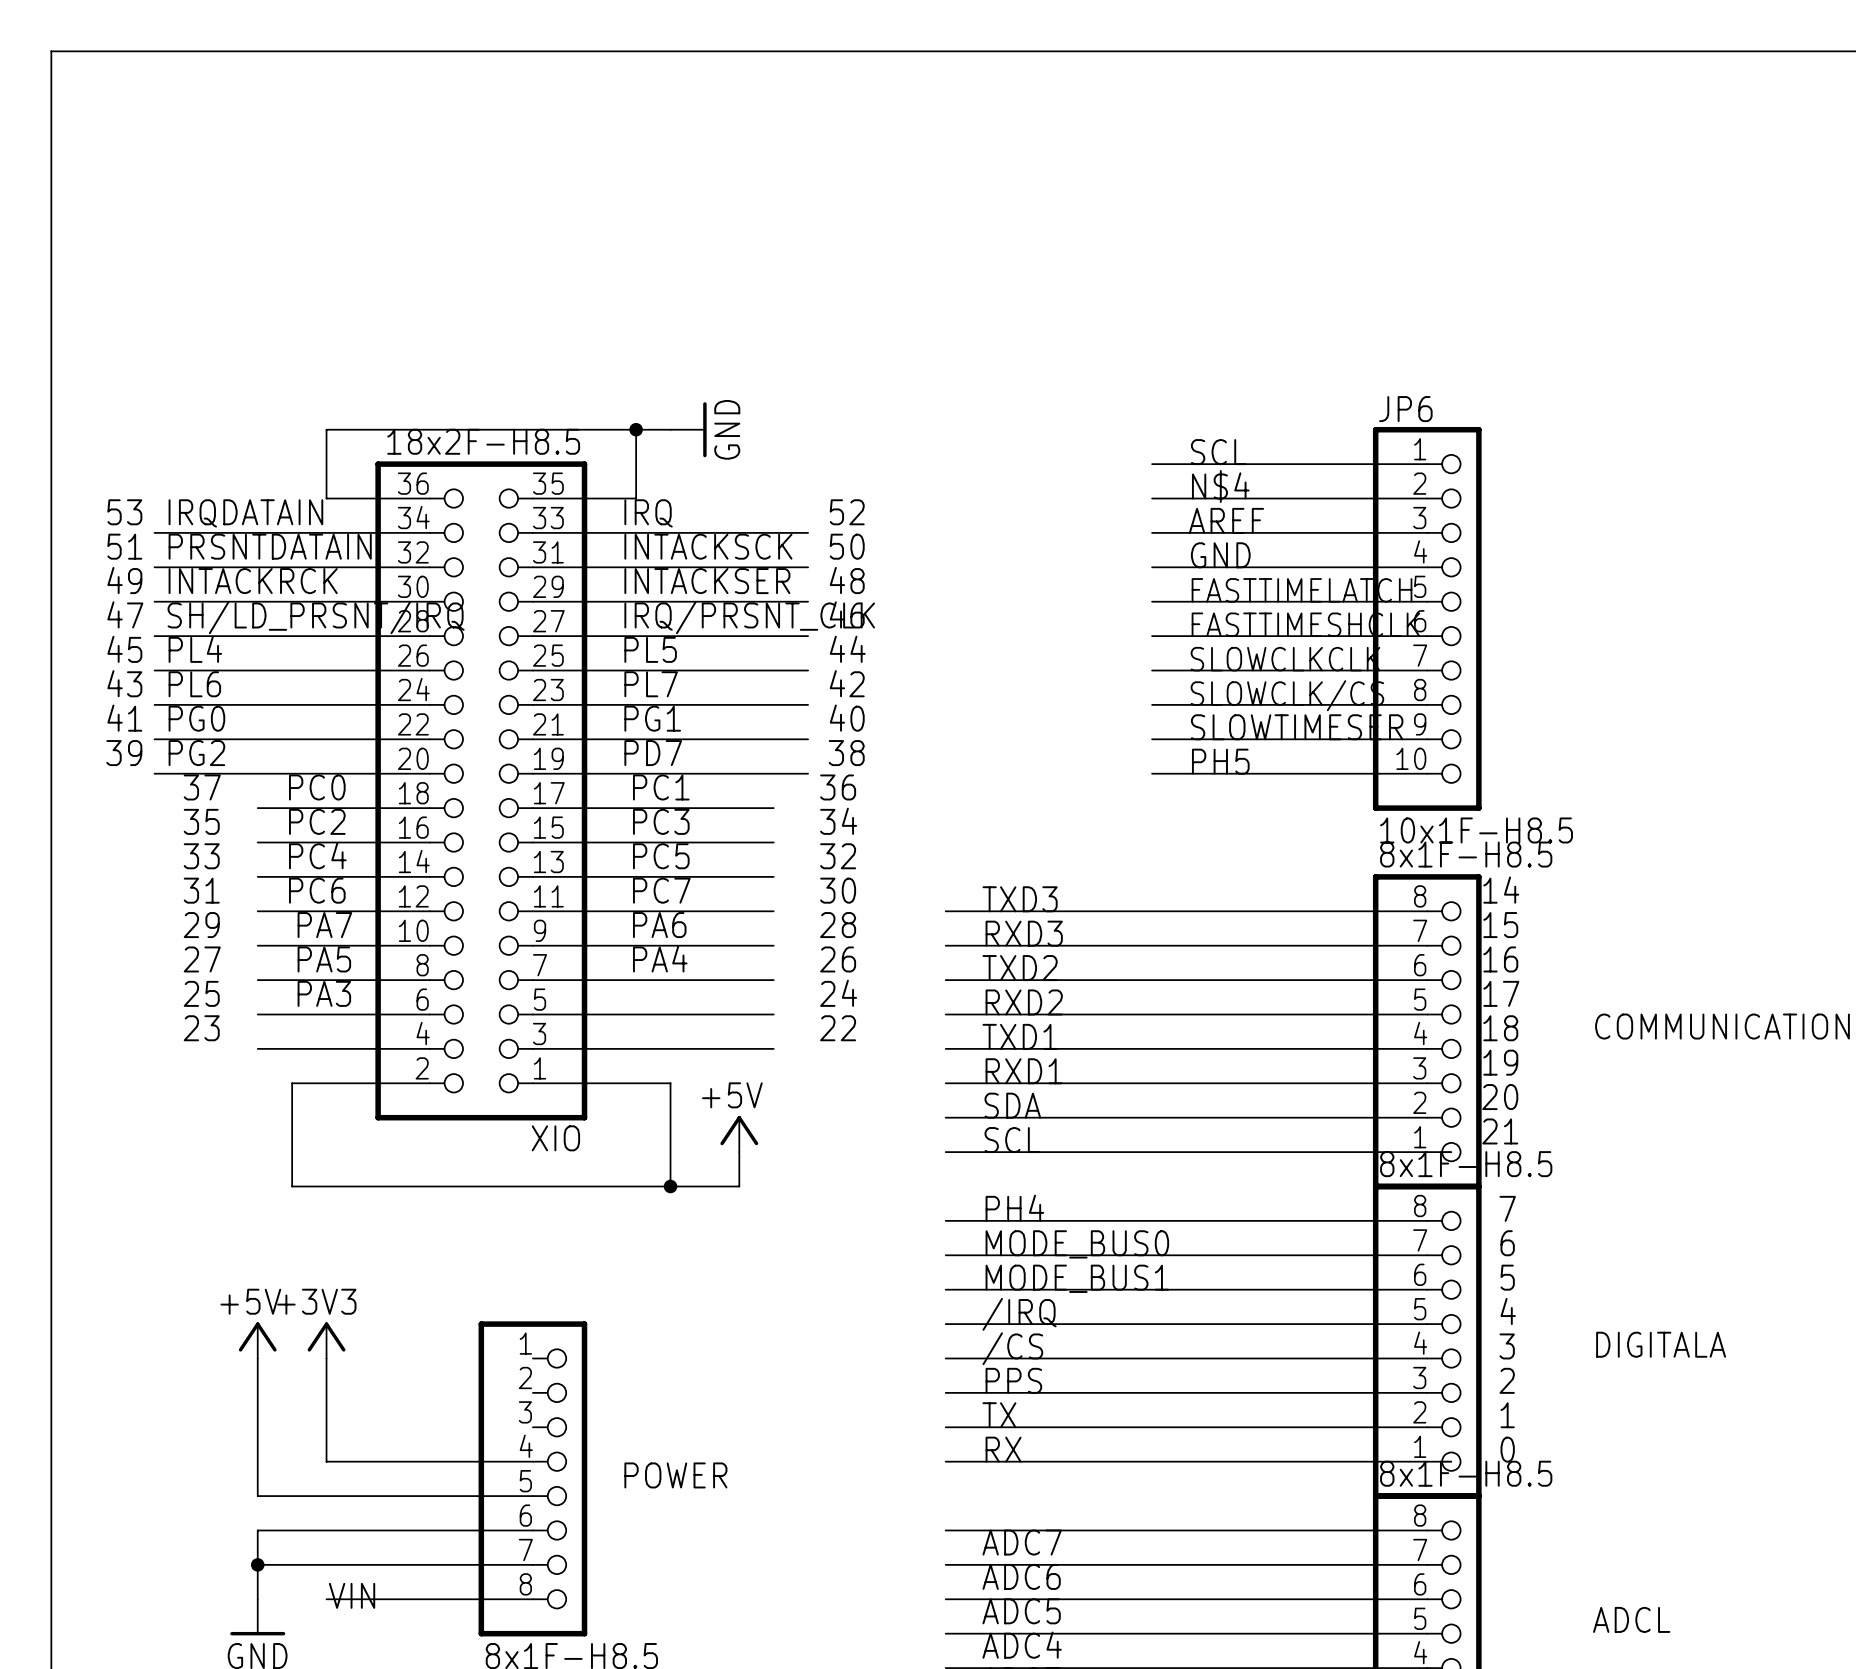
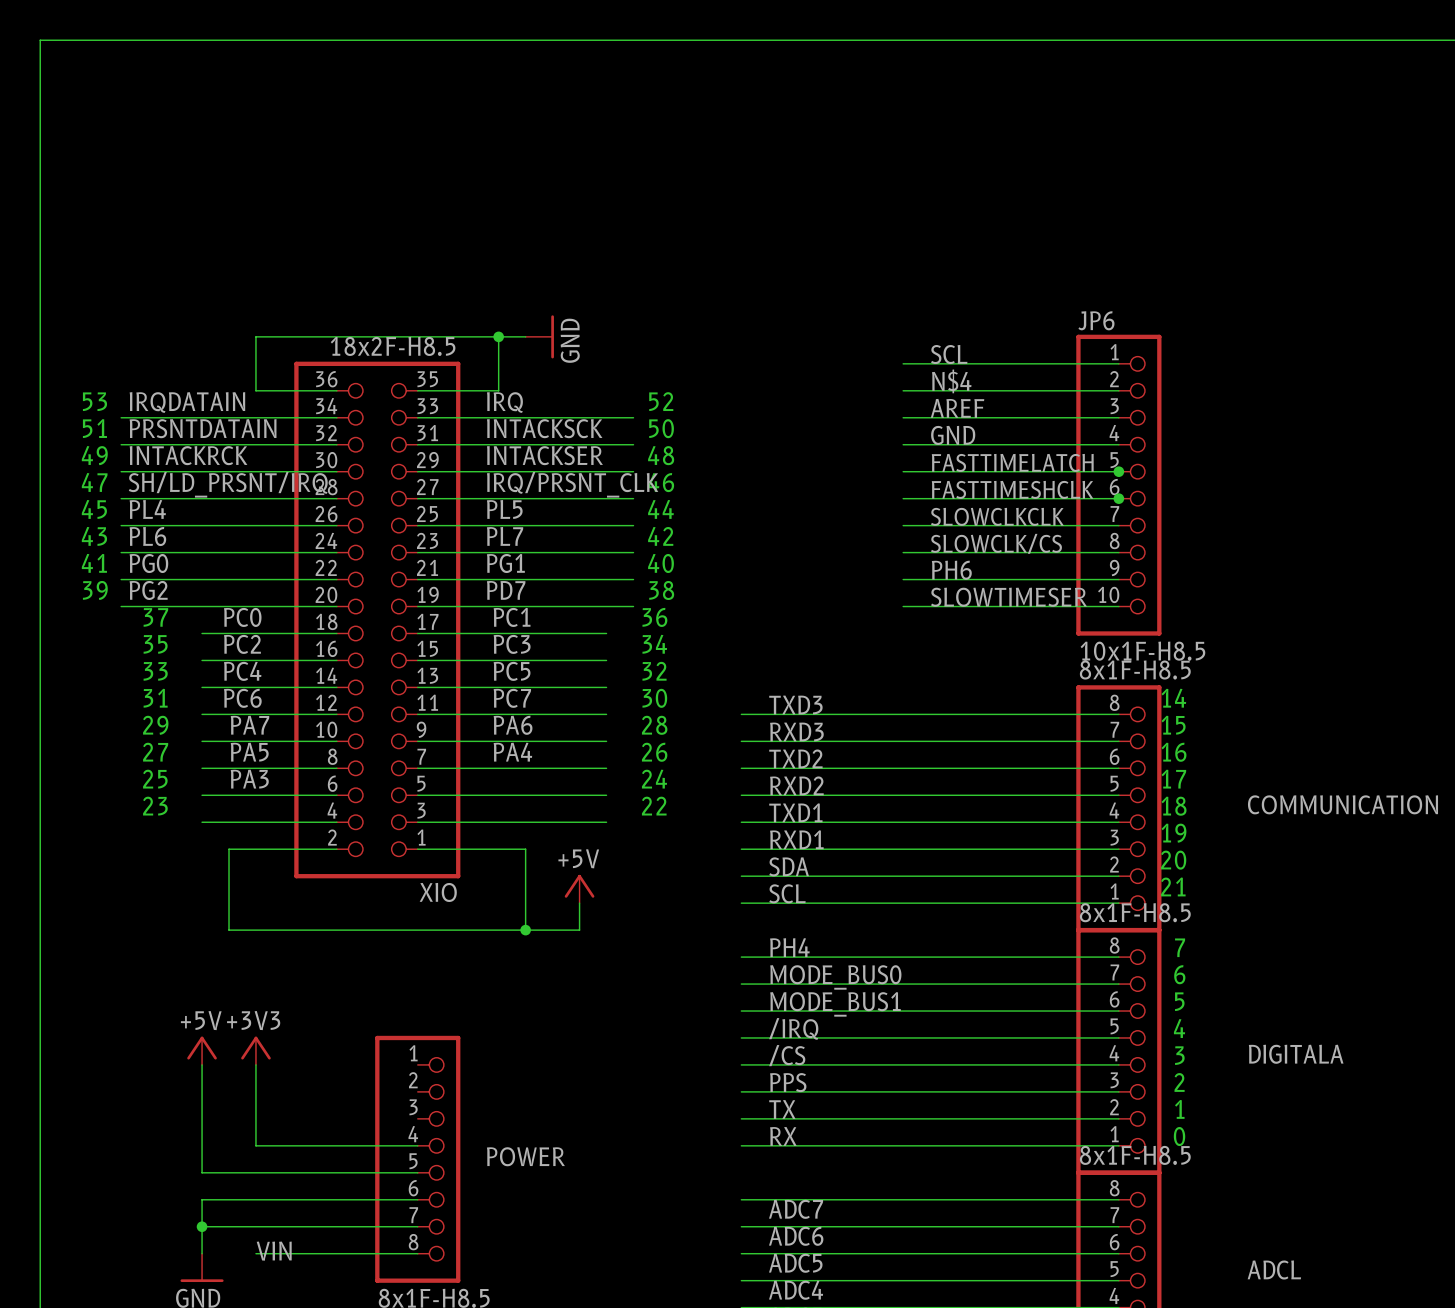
junction: none -> (1118, 471)
junction: none -> (1118, 498)
label: SLOWTIMESER (1297, 727) -> PH6 (951, 570)
label: PH5 (1220, 761) -> SLOWTIMESER (1008, 597)

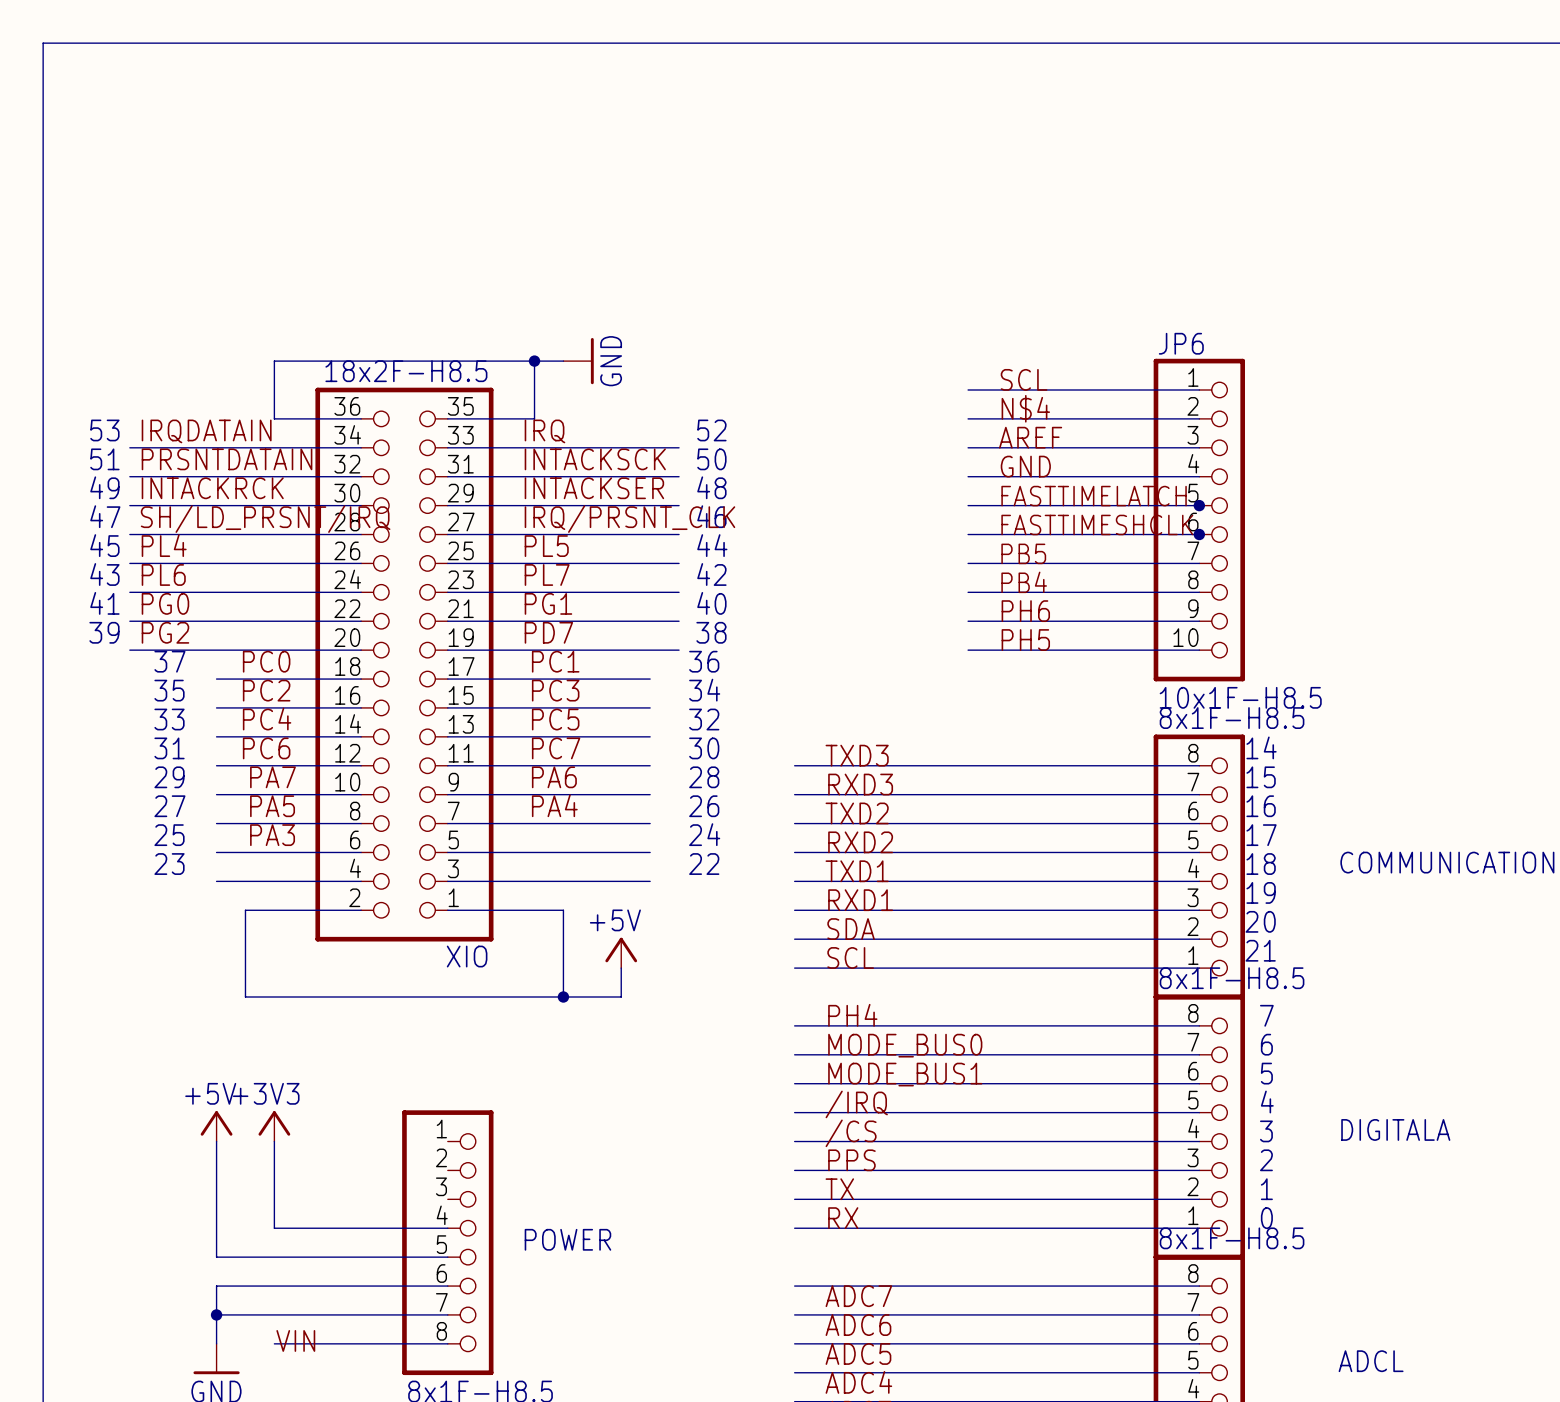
label: SLOWCLKCLK (997, 516) -> PB5 (1023, 553)
label: SLOWCLK/CS (996, 543) -> PB4 (1024, 582)
label: SLOWTIMESER (1008, 597) -> PH5 (1025, 640)

